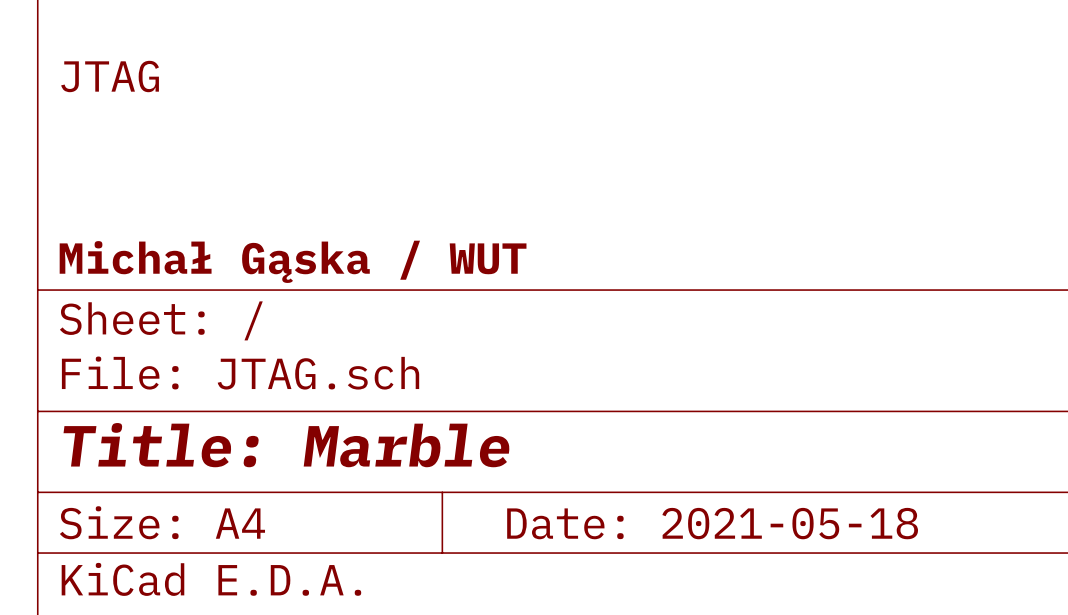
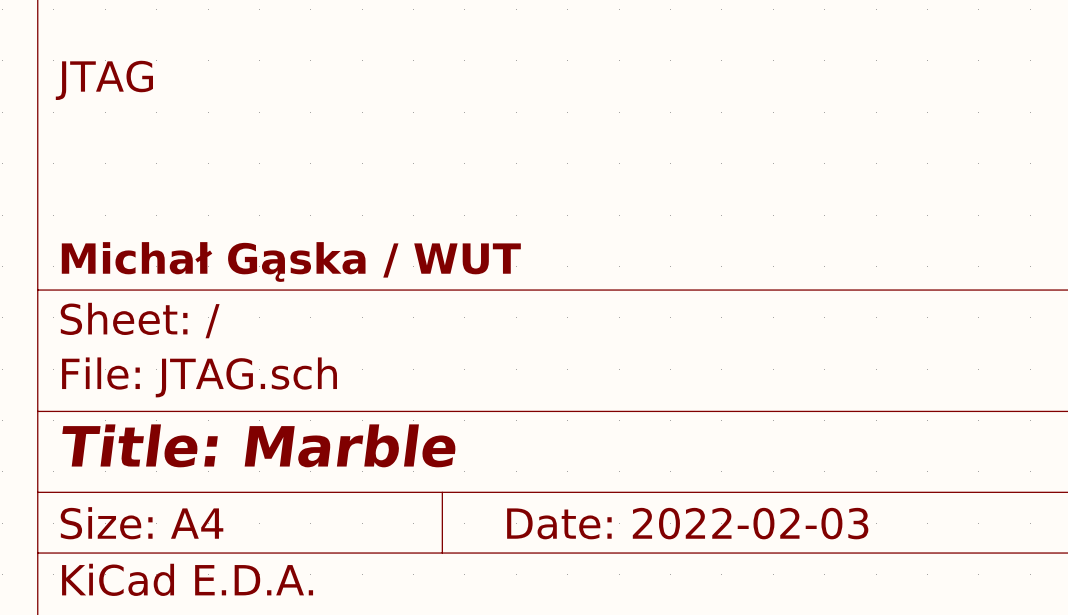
title block: Date: 2021-05-18 (712, 523) -> Date: 2022-02-03 (687, 523)

